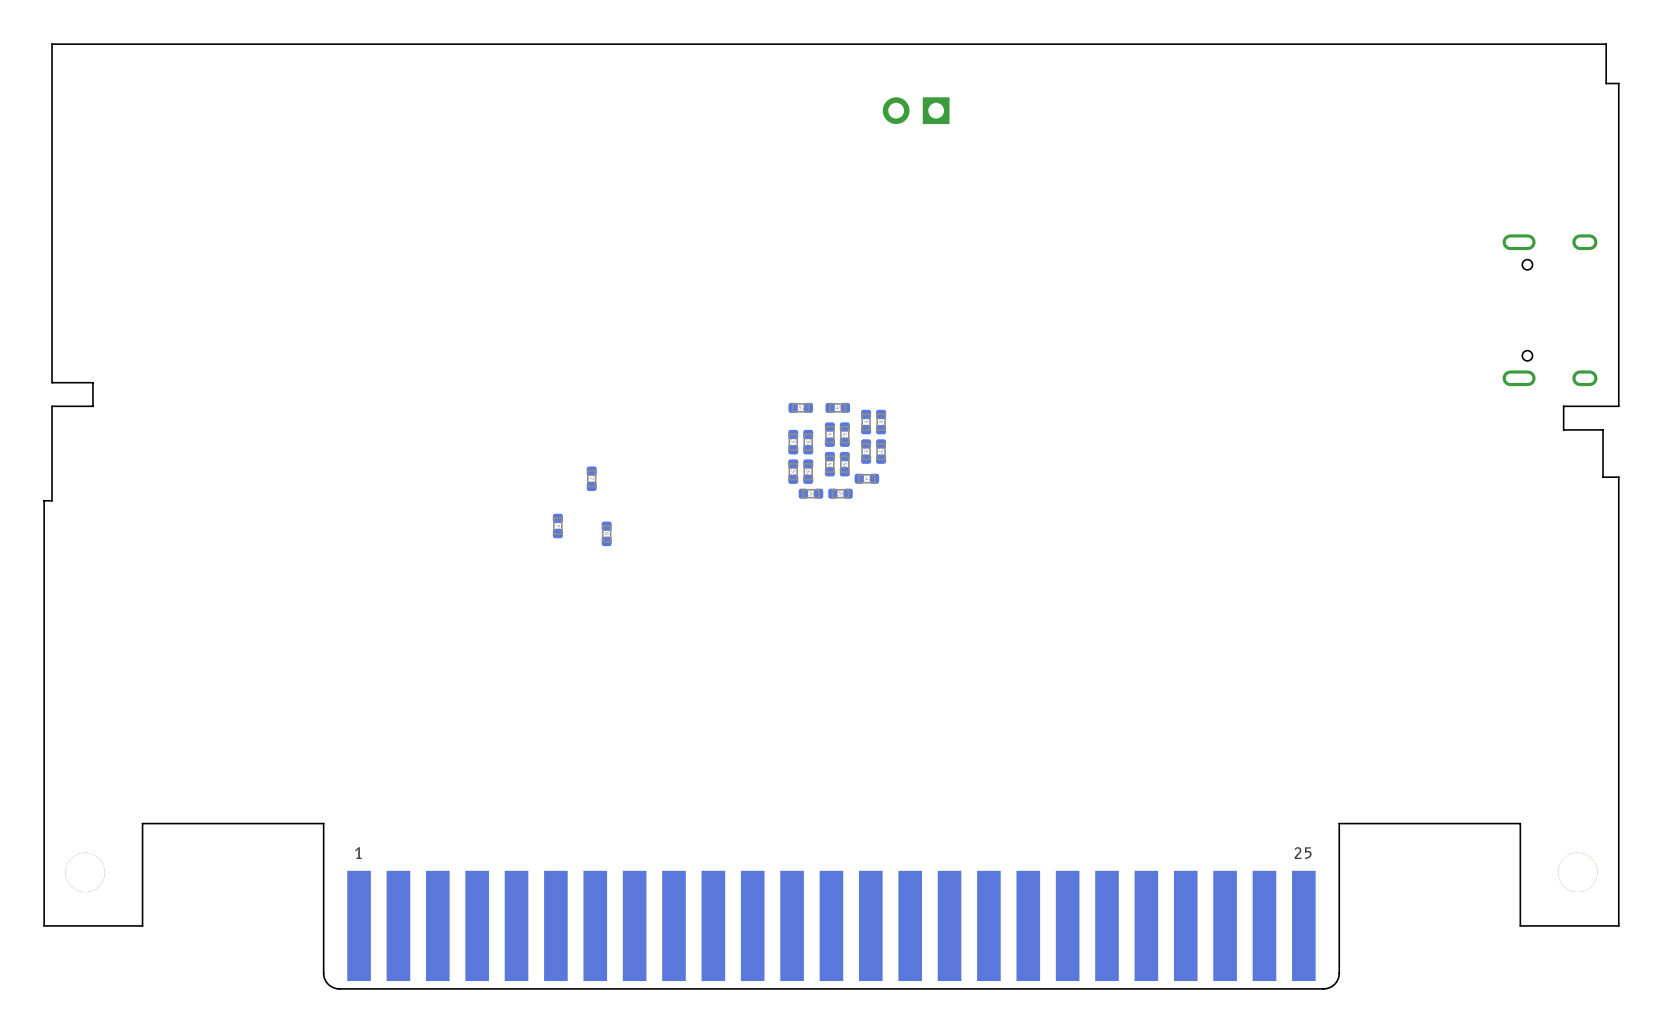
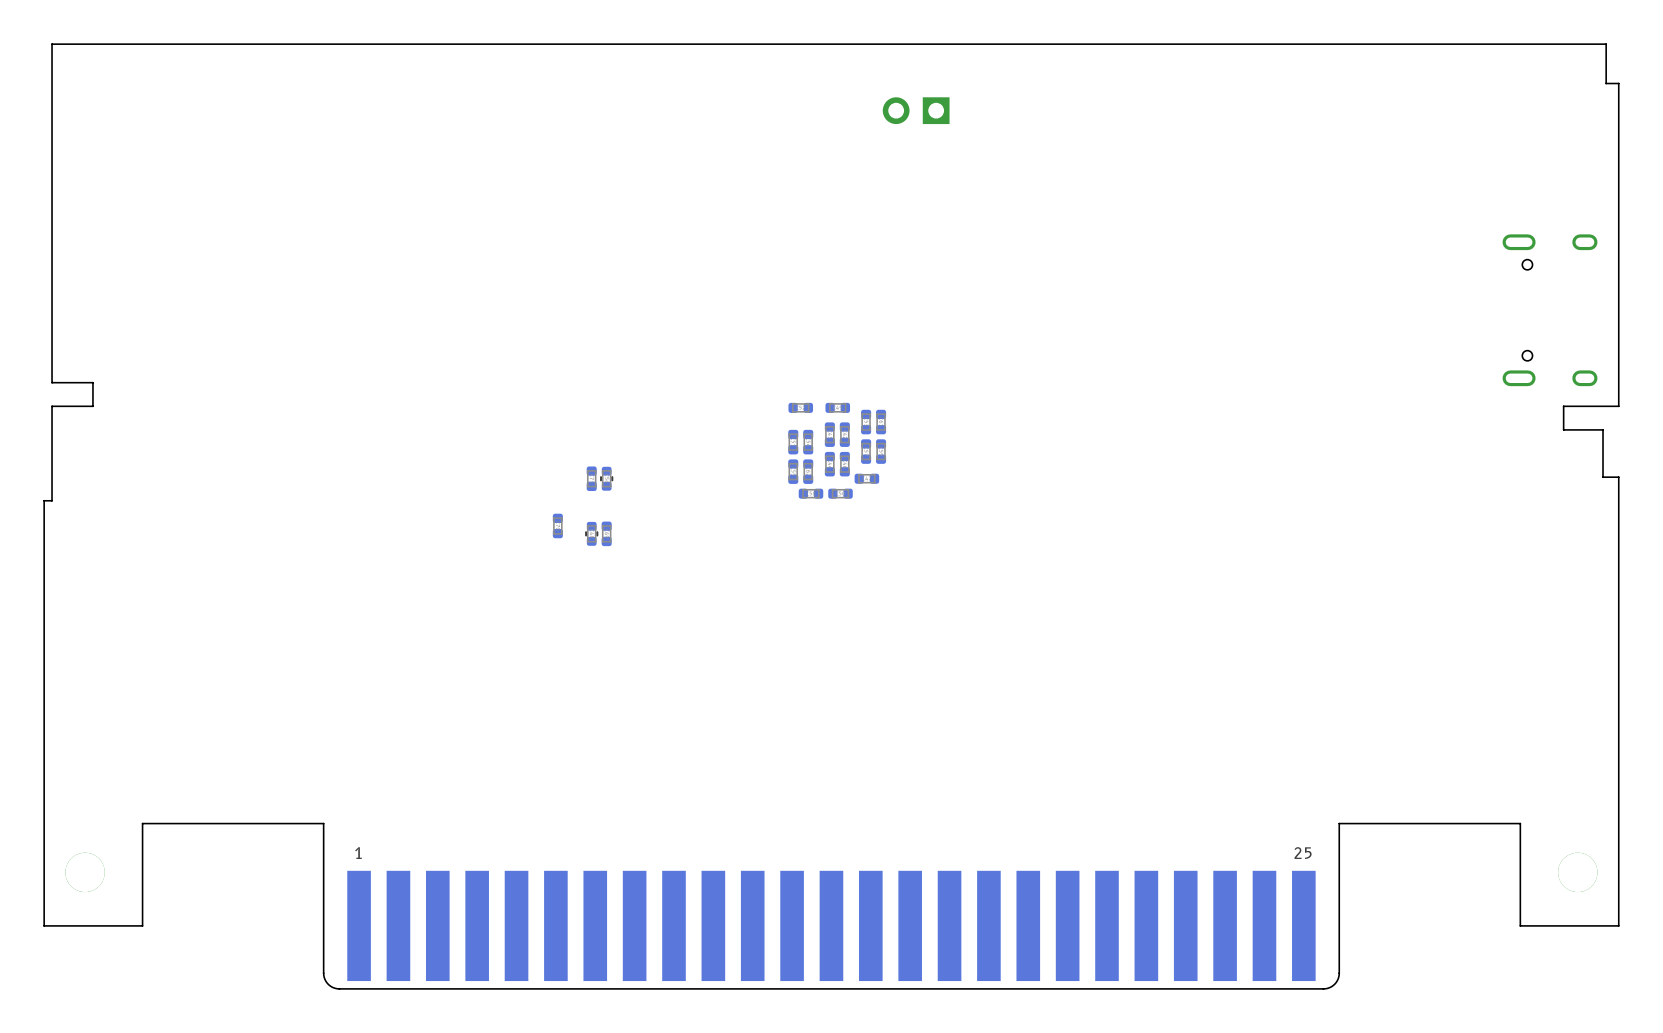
part: none -> (606, 478)
part: none -> (591, 533)

